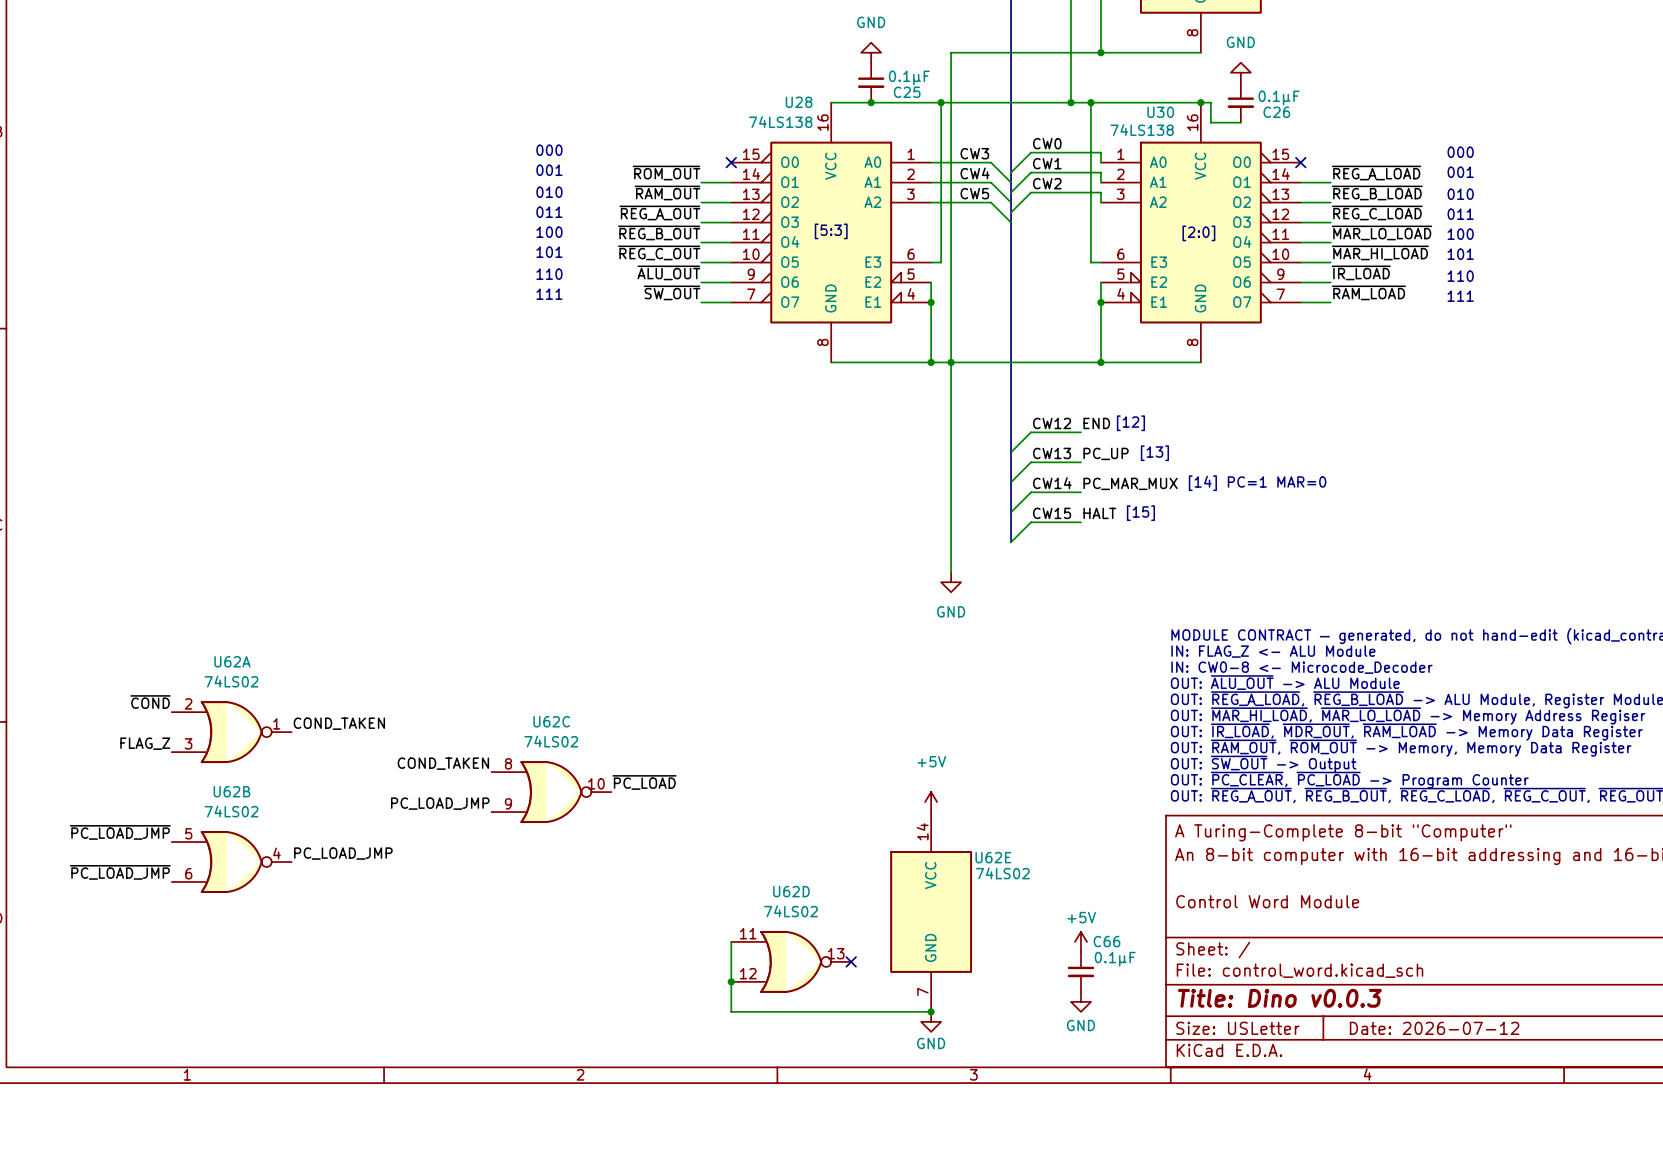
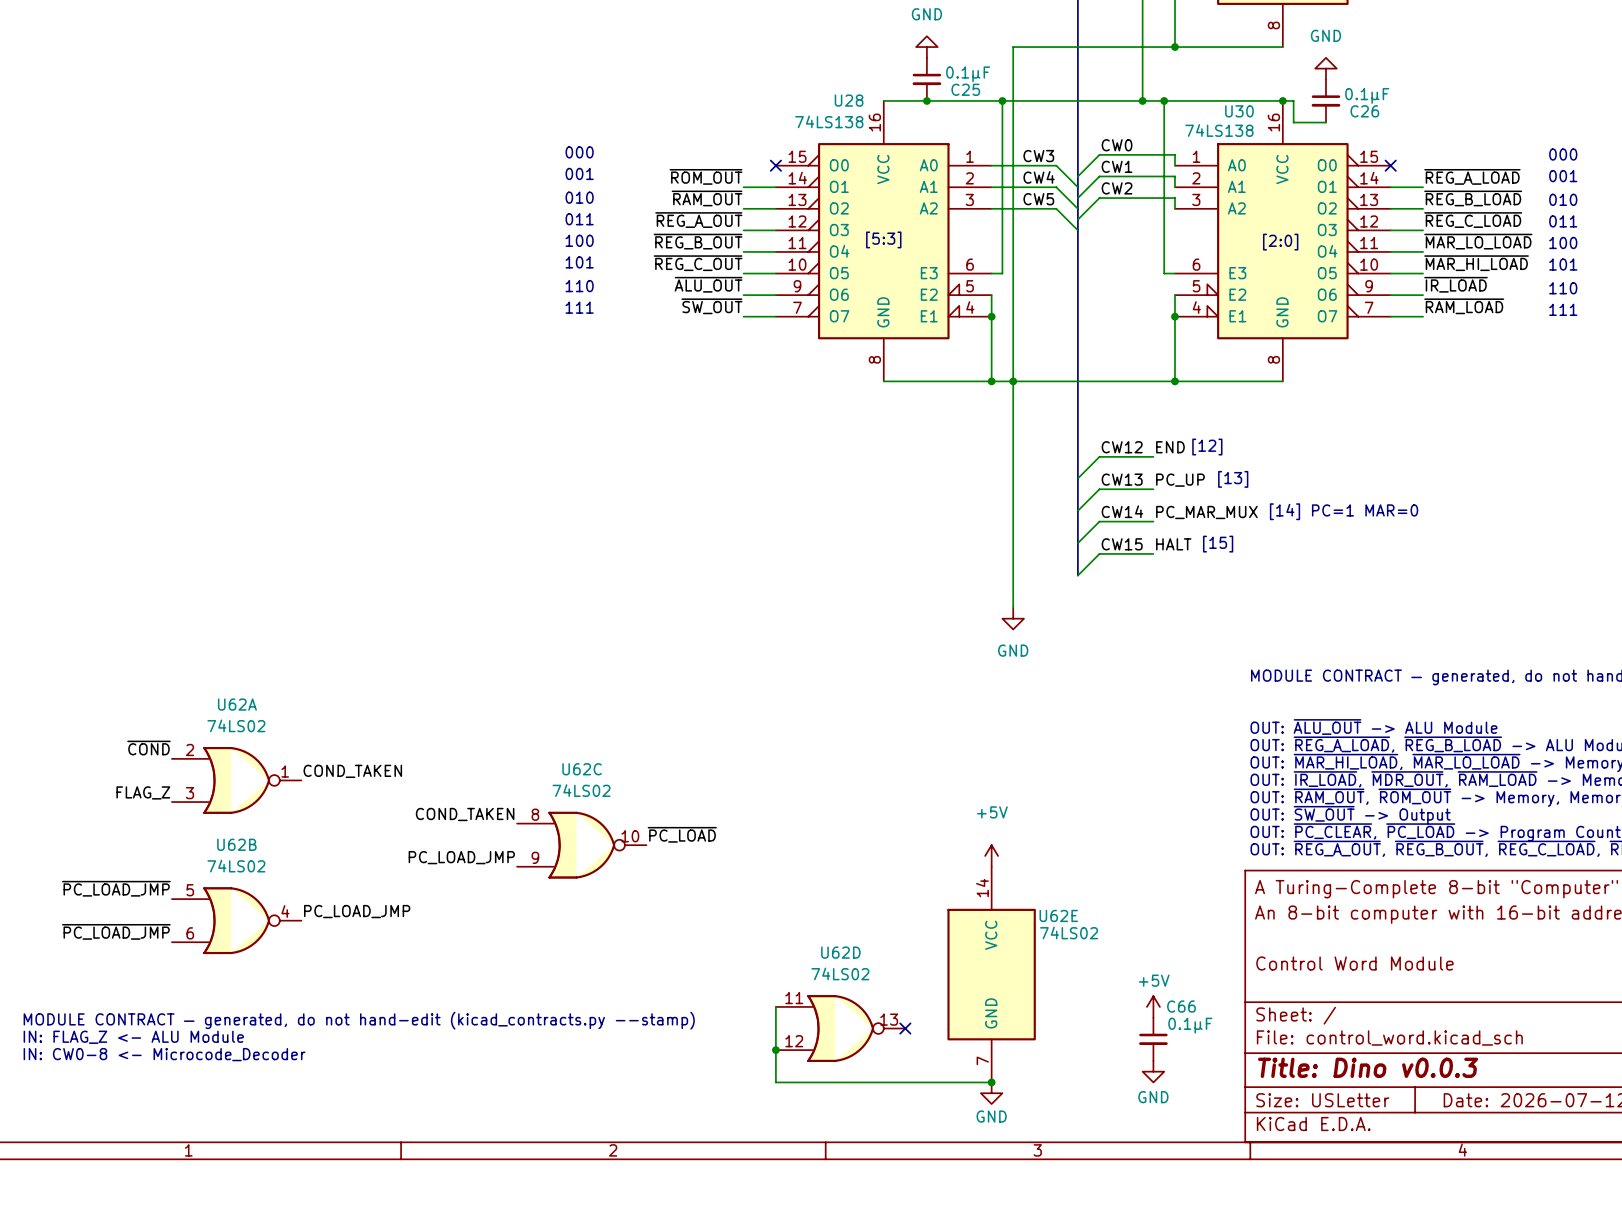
text: IN: FLAG_Z <- ALU Module (1273, 651) -> none
text: IN: CW0-8 <- Microcode_Decoder (1301, 667) -> none
text: none -> MODULE CONTRACT — generated, do not hand-edit (kicad_contracts.py --stamp) (359, 1020)
text: none -> IN: FLAG_Z <- ALU Module (133, 1037)
text: none -> IN: CW0-8 <- Microcode_Decoder (164, 1054)

